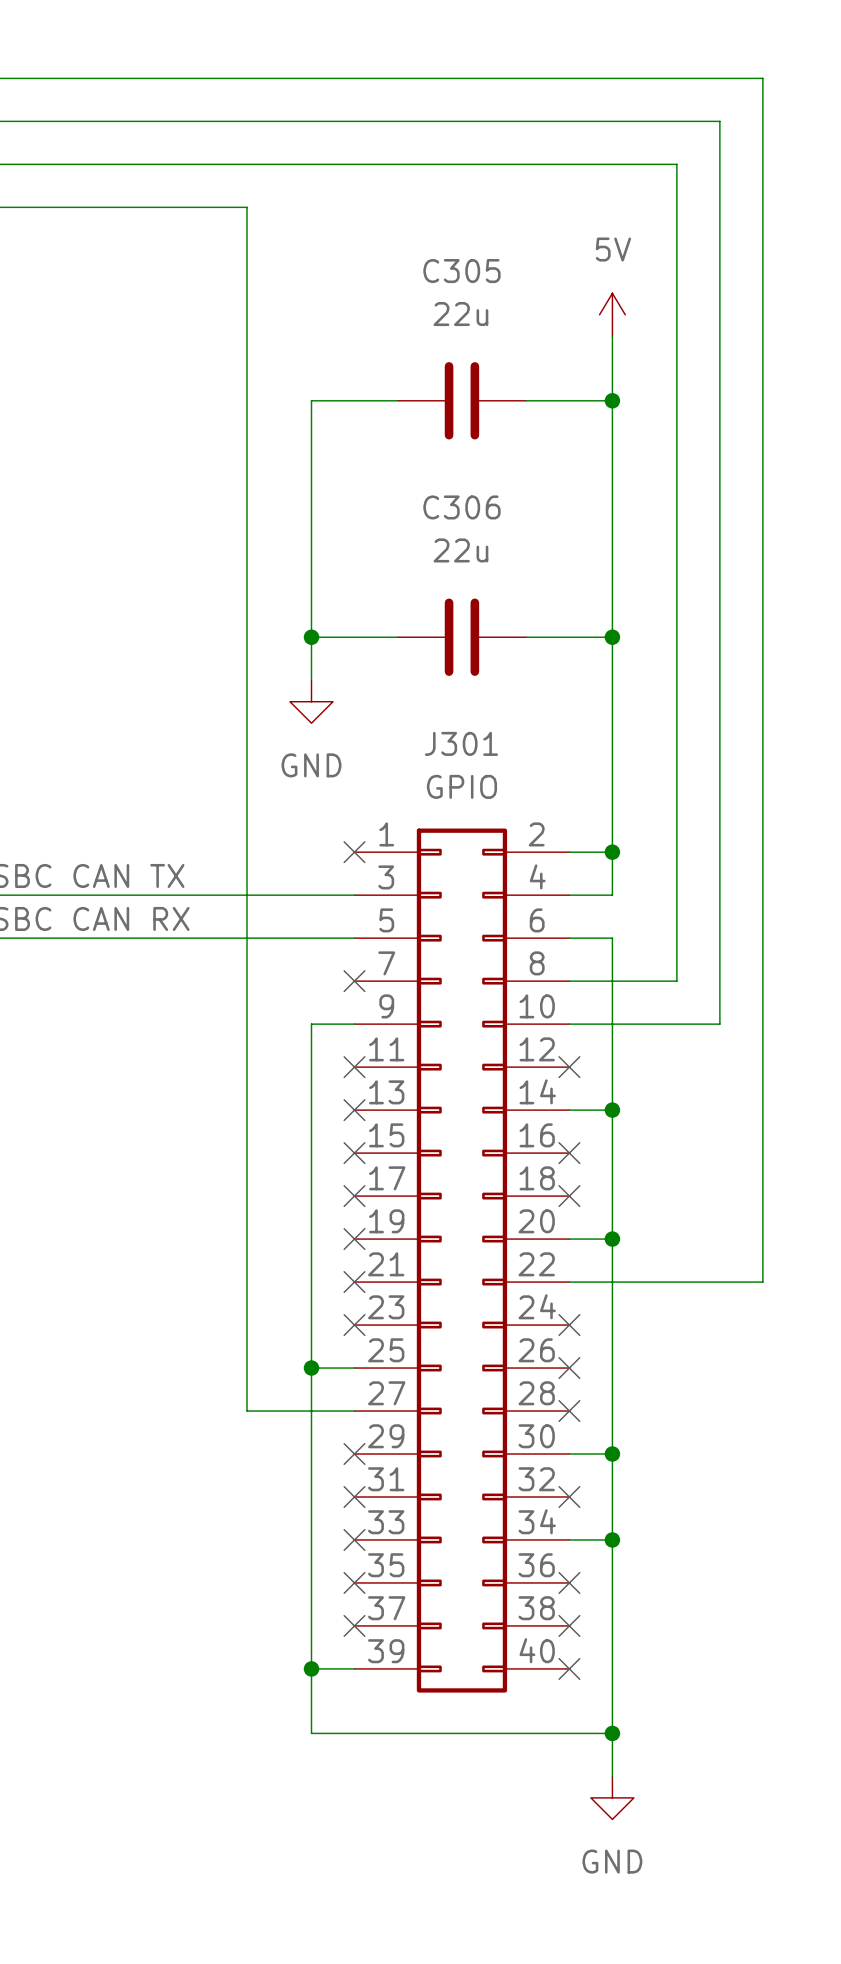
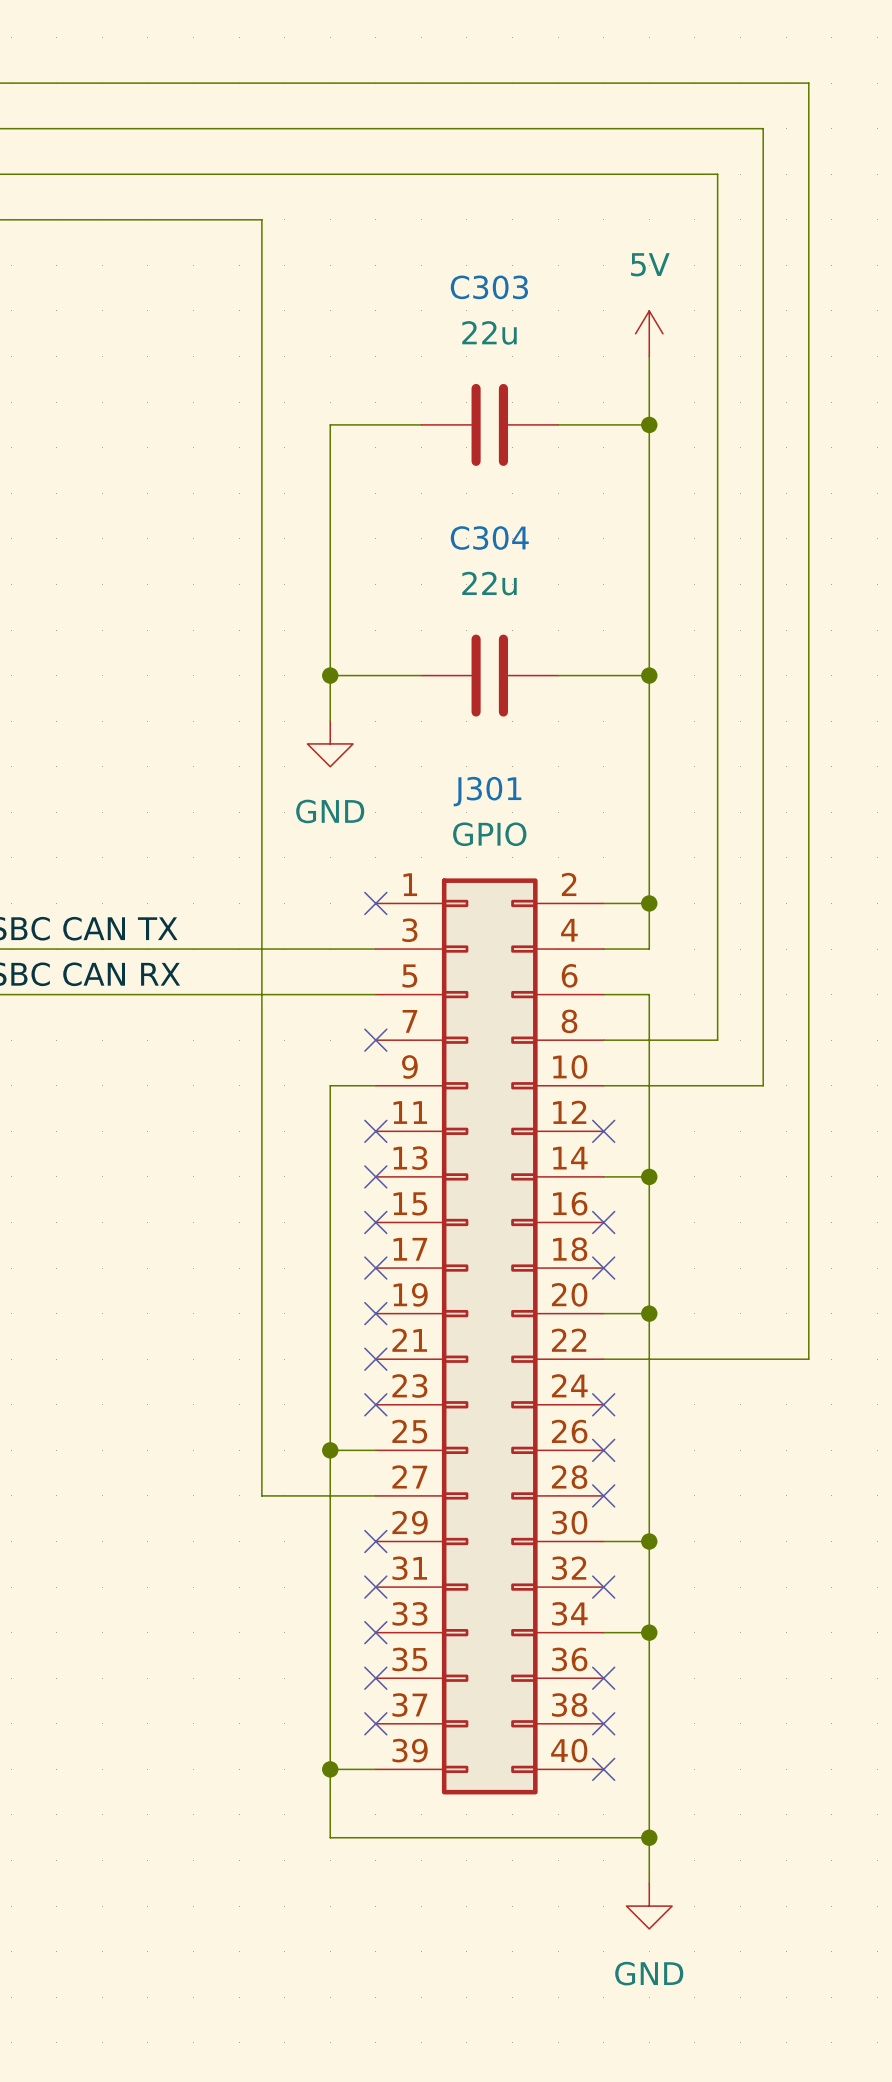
C305 name: C305 (461, 271) -> C303 (489, 287)
C306 name: C306 (461, 507) -> C304 (489, 538)

